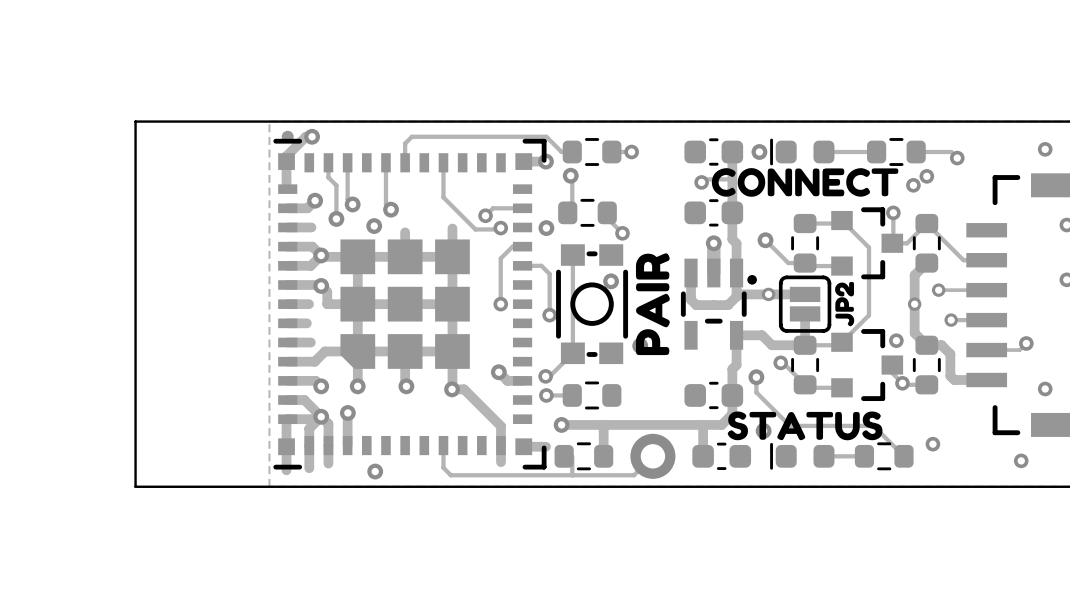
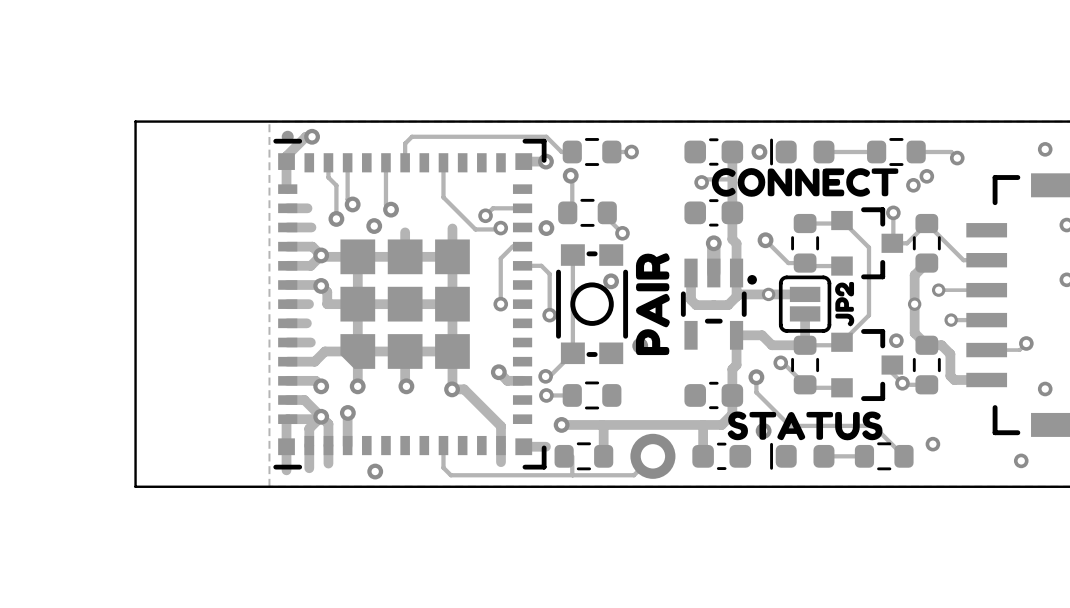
via: (315, 200) -> none

